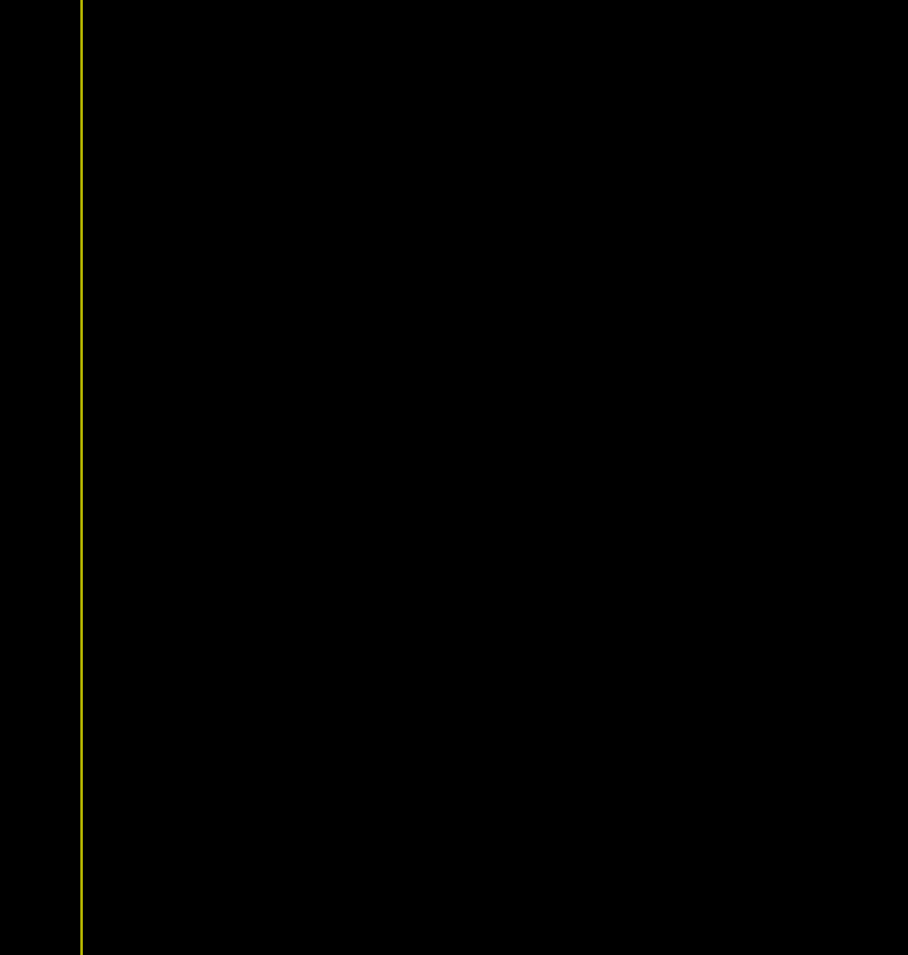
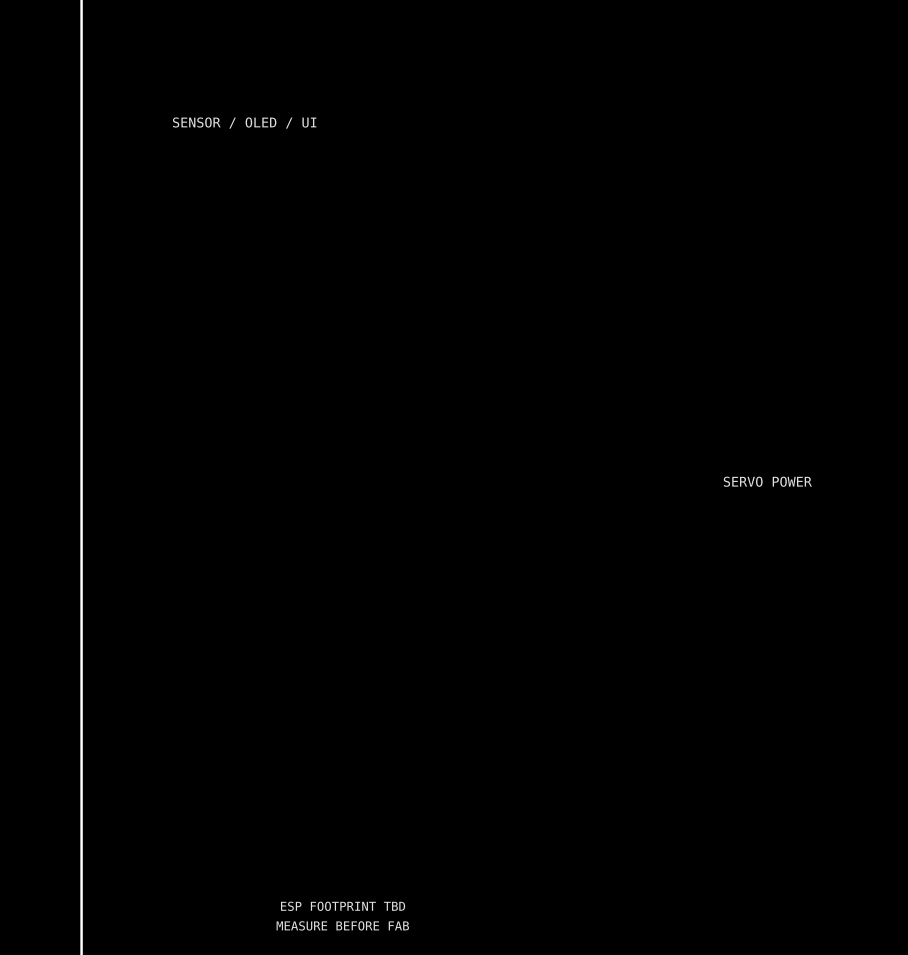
text: none -> SENSOR / OLED / UI (244, 123)
text: none -> SERVO POWER (767, 481)
text: none -> ESP FOOTPRINT TBD (343, 906)
text: none -> MEASURE BEFORE FAB (342, 925)

